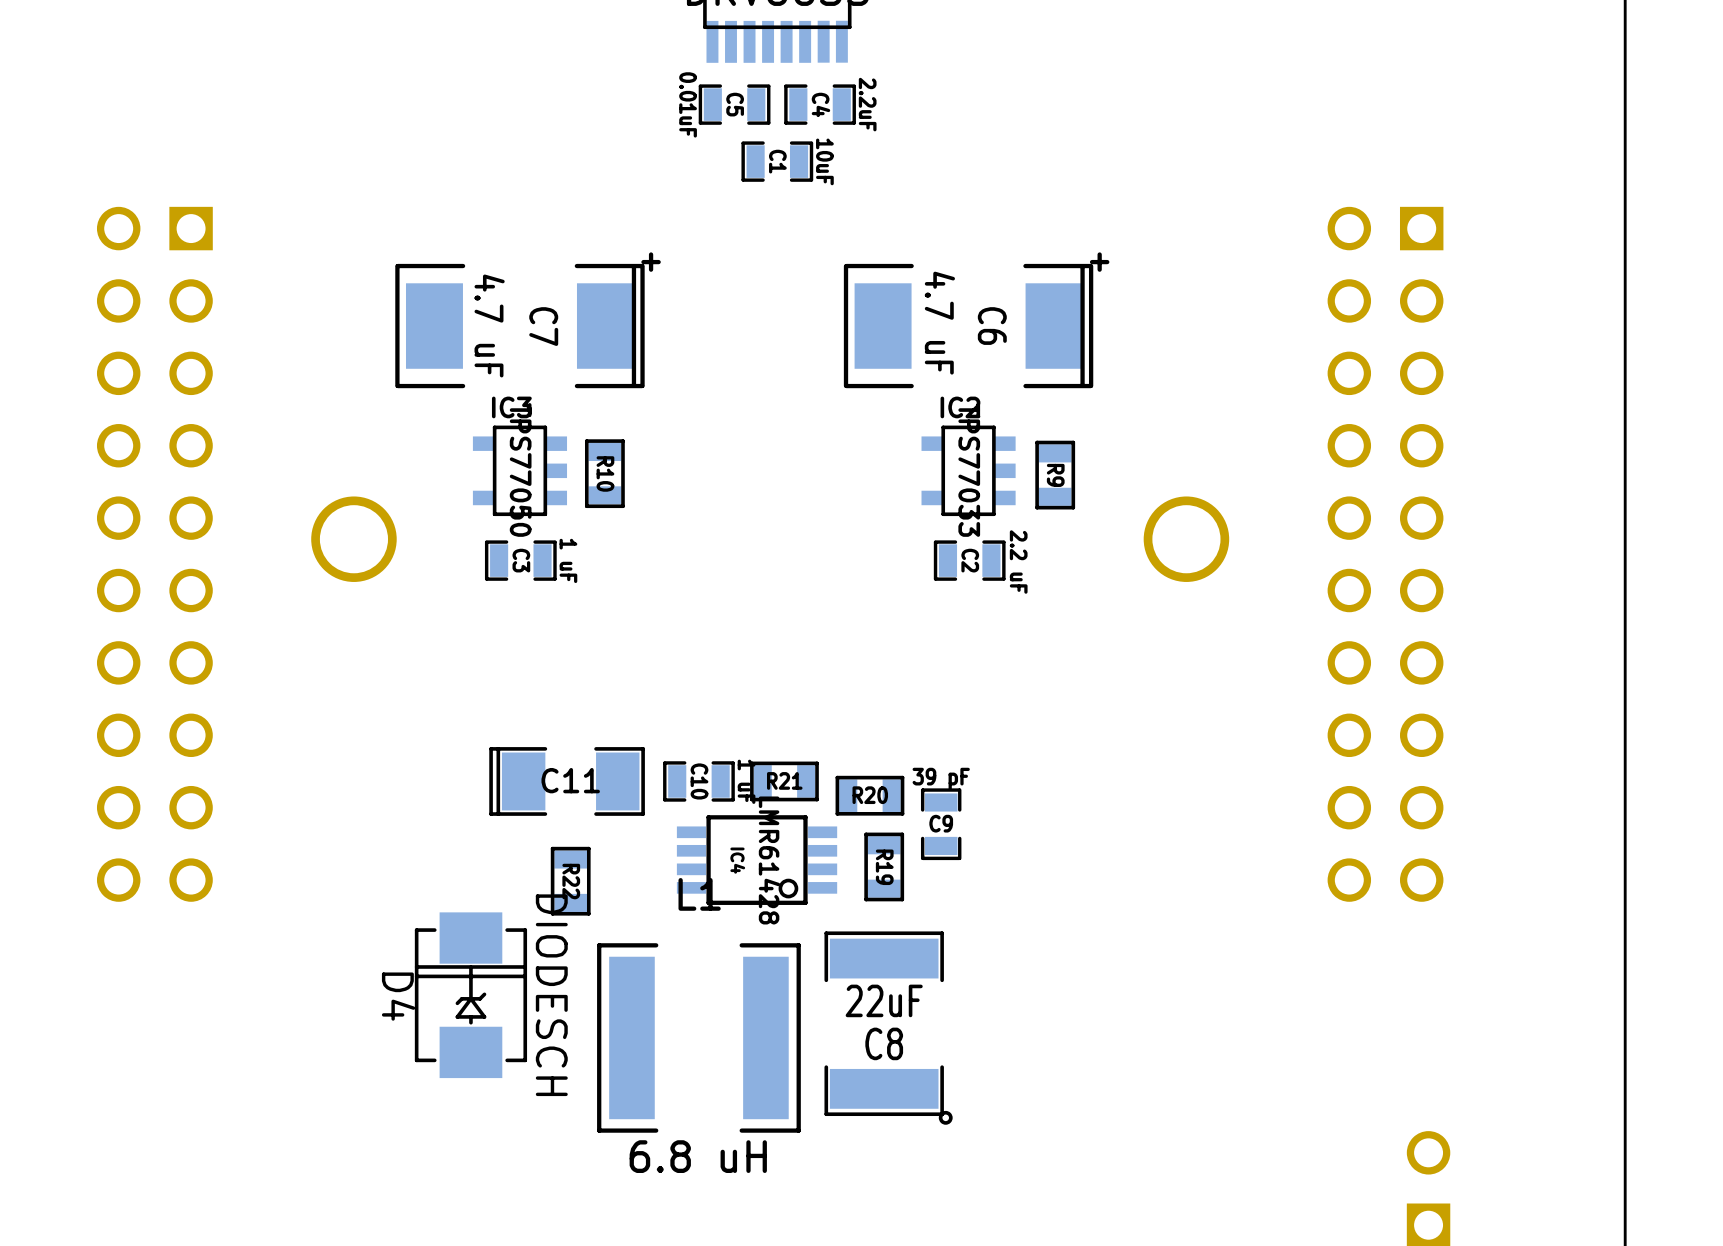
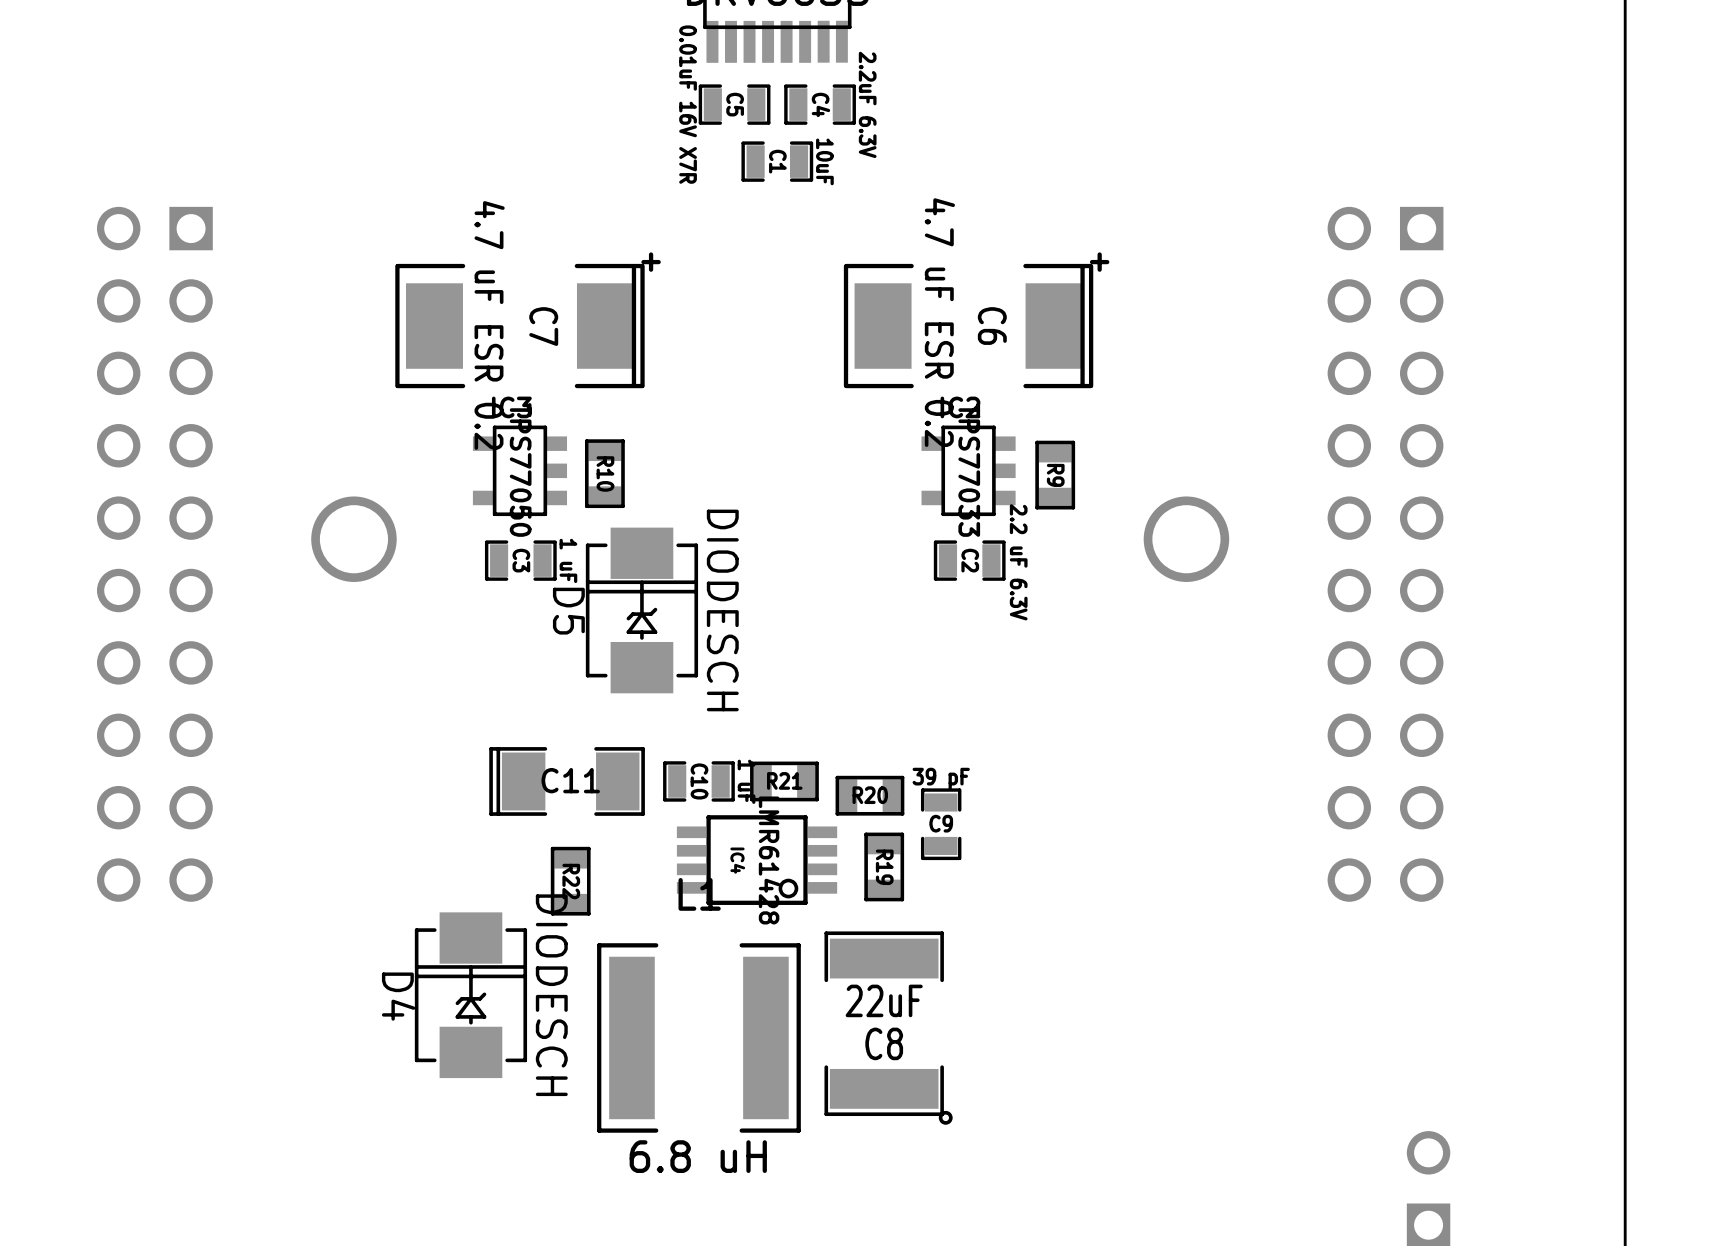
C5 value: 0.01uF (688, 104) -> 0.01uF 16V X7R (688, 104)
C4 value: 2.2uF (867, 104) -> 2.2uF 6.3V (867, 104)
C6 value: 4.7 uF (939, 323) -> 4.7 uF ESR 0.2 (939, 322)
C7 value: 4.7 uF (489, 325) -> 4.7 uF ESR 0.2 (489, 325)
C2 value: 2.2 uF (1018, 562) -> 2.2 uF 6.3V (1018, 562)
D5: none -> DIODESCH (641, 610)

